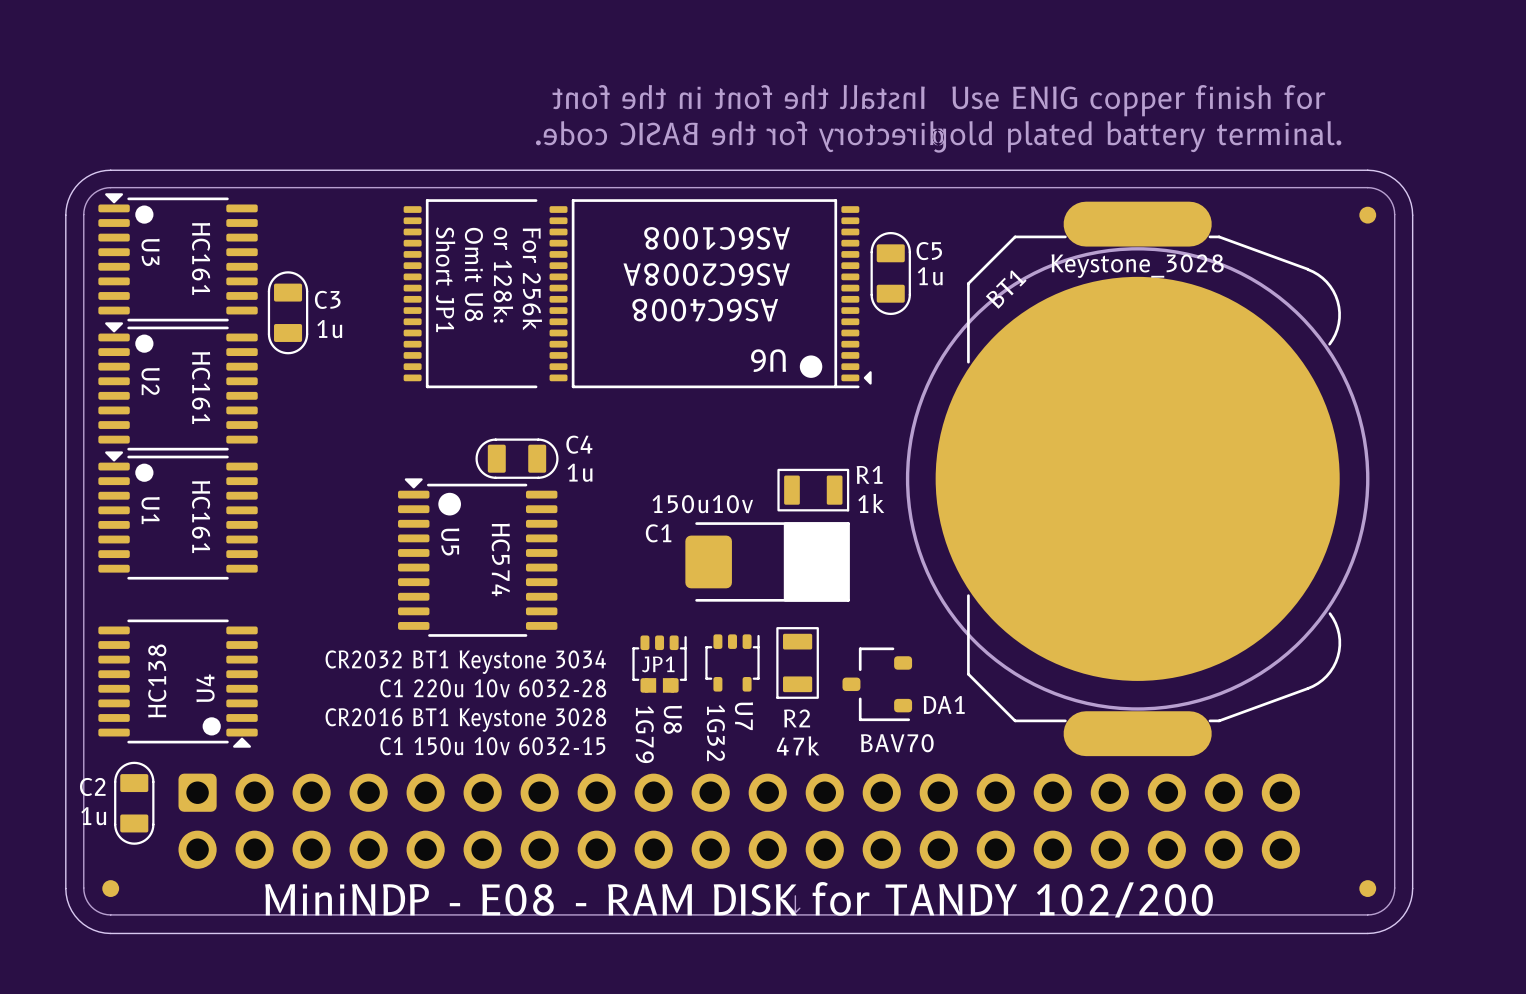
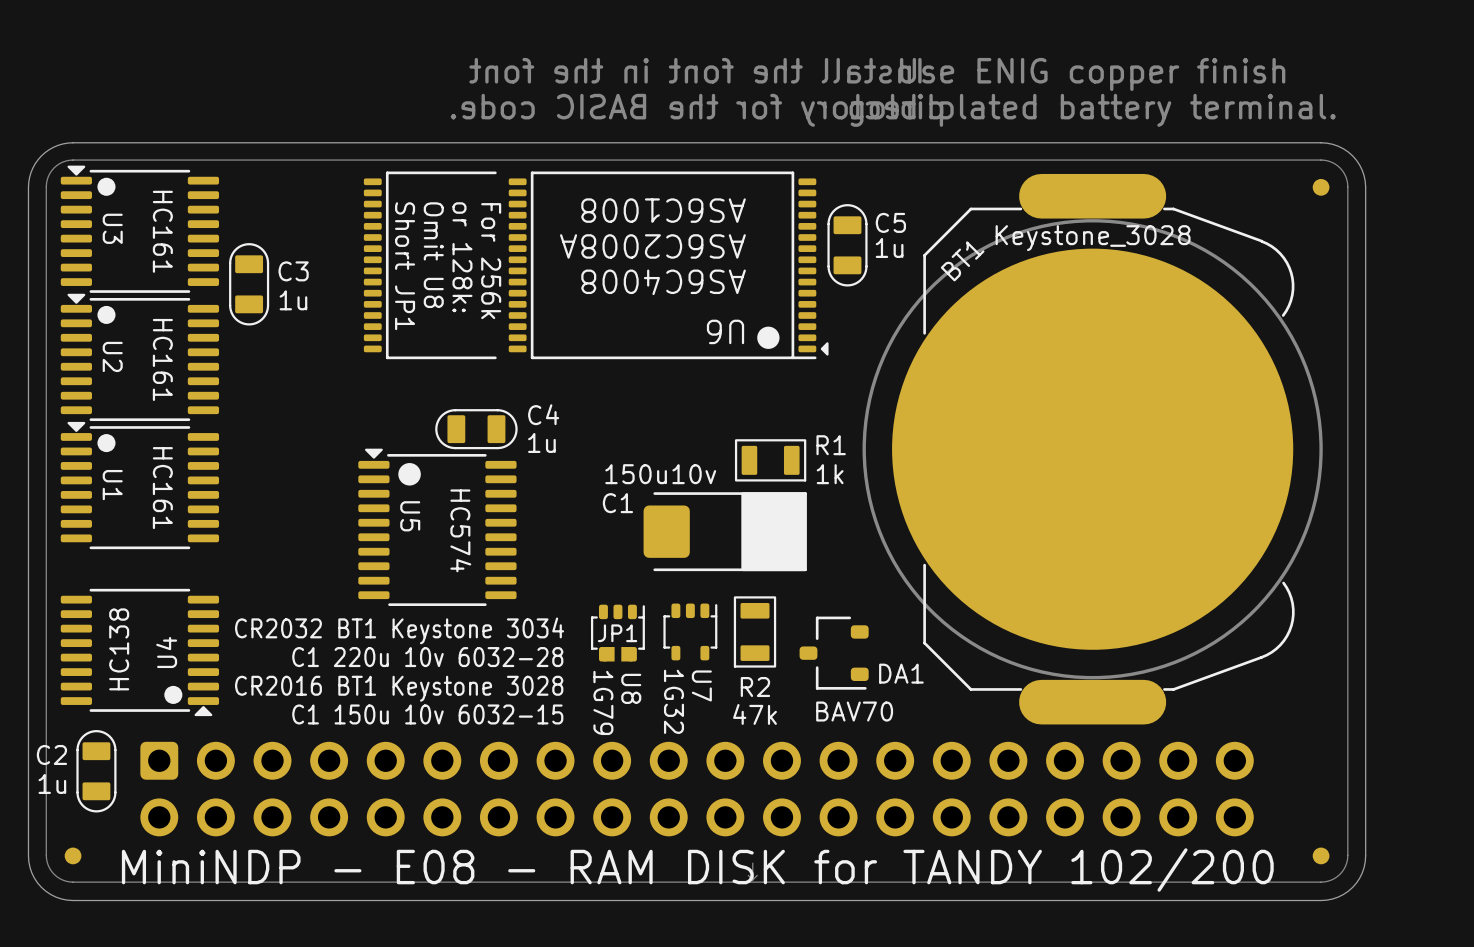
text: Use ENIG copper finish for (1138, 100) -> Use ENIG copper finish (1092, 74)

